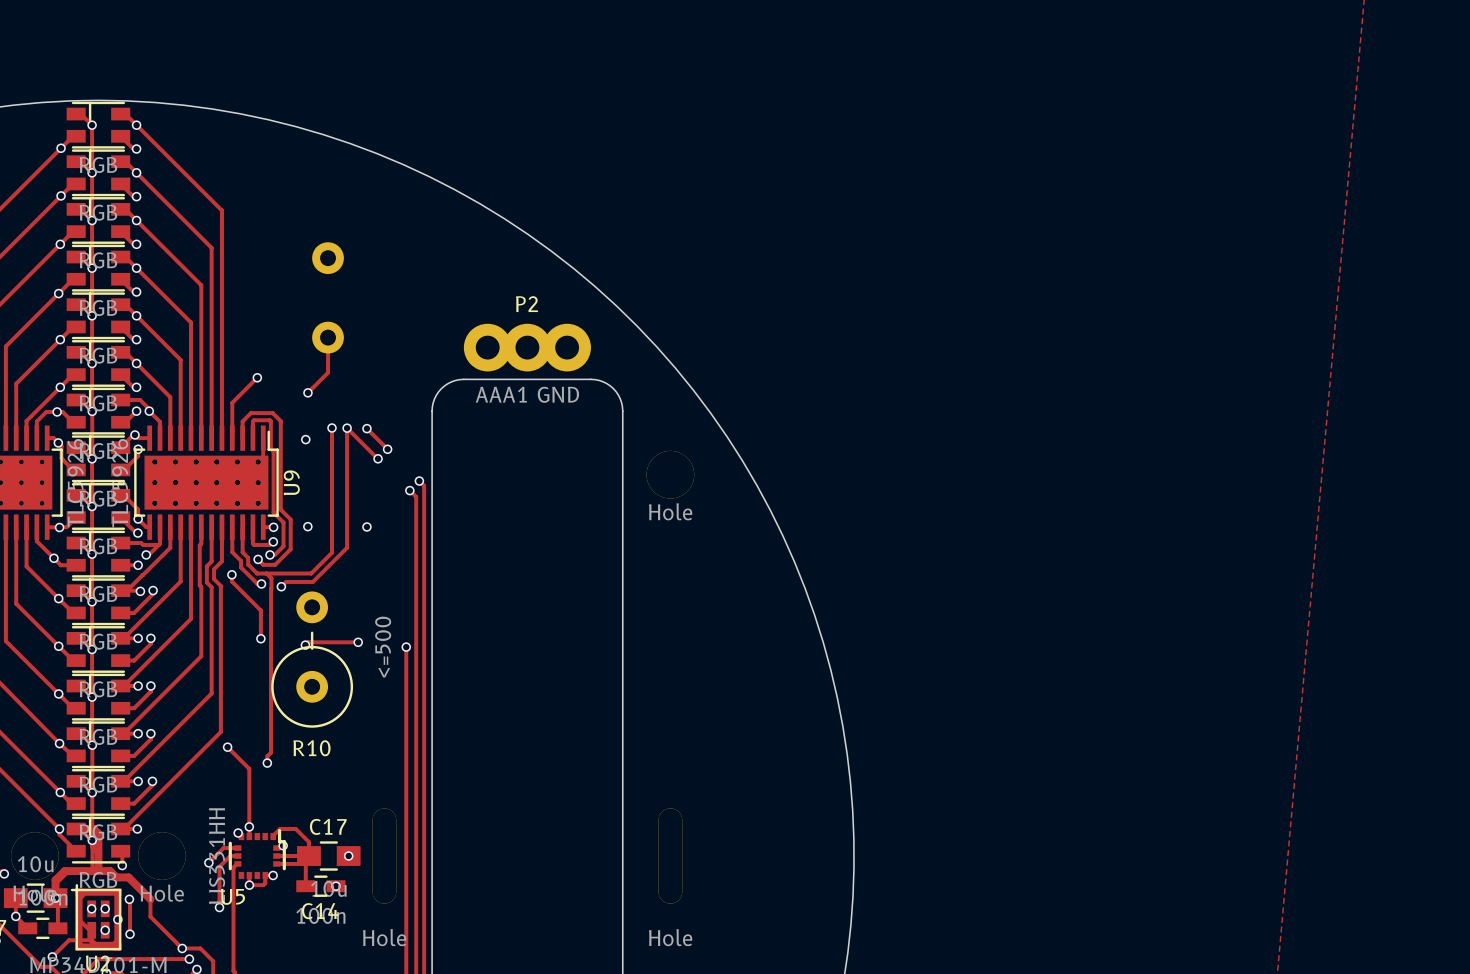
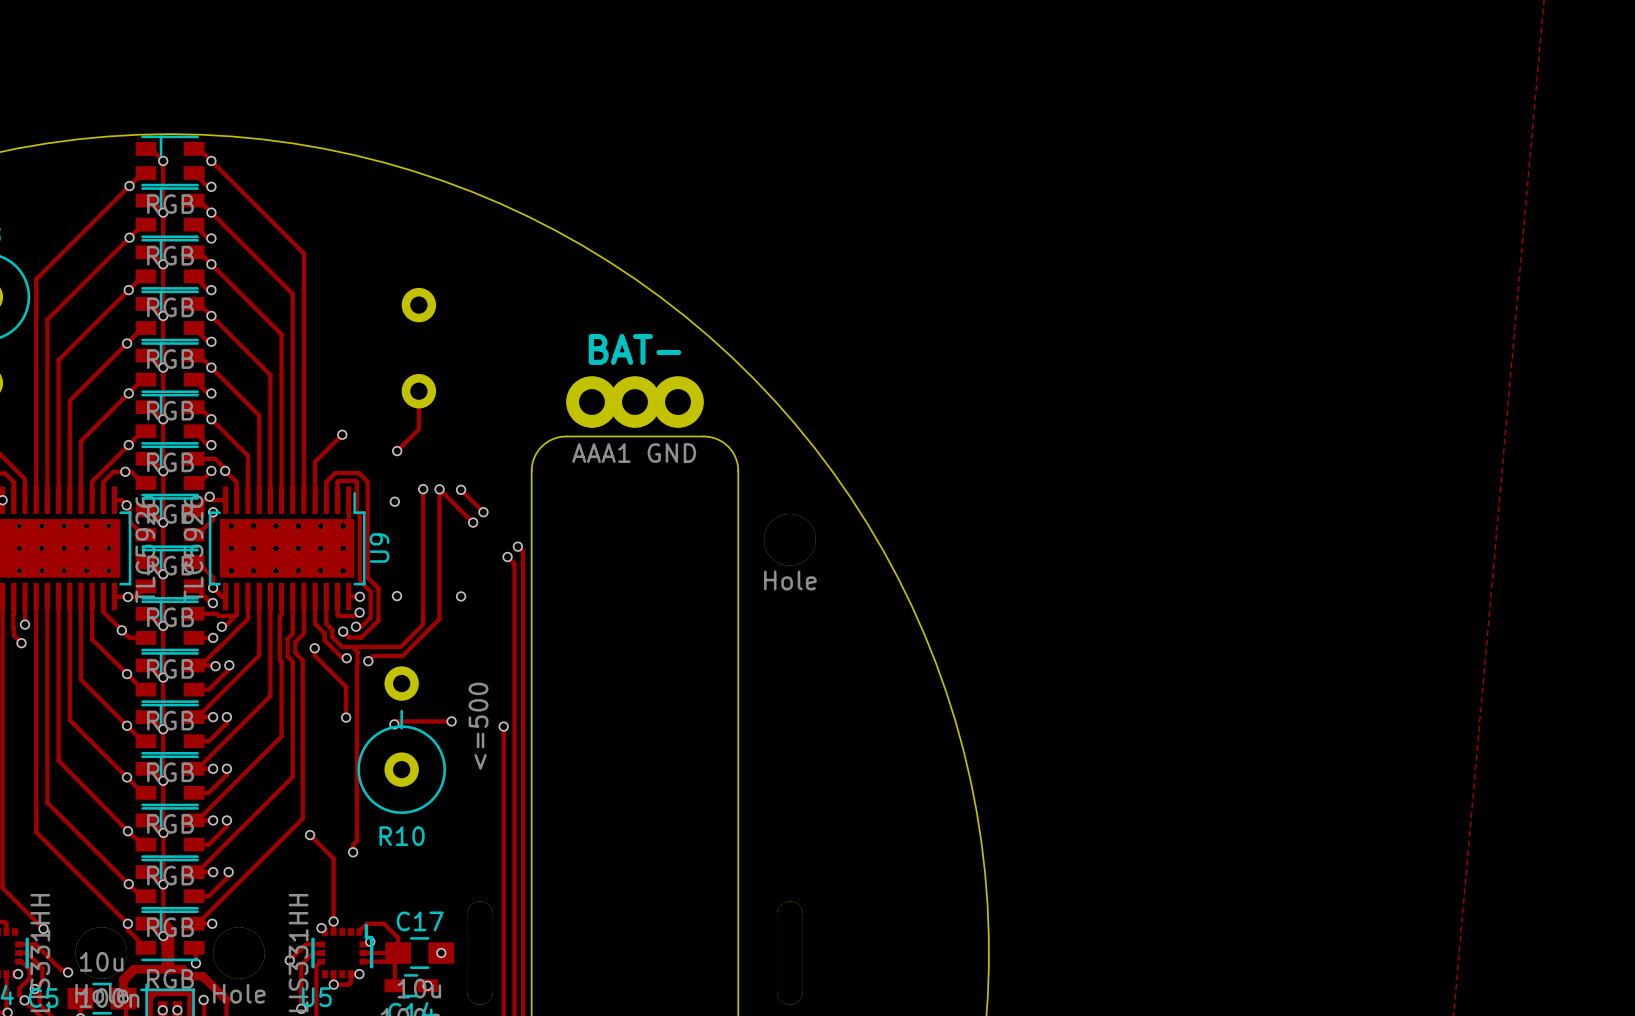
text: none -> BAT- (634, 349)
P2 name: P2 (526, 304) -> none

